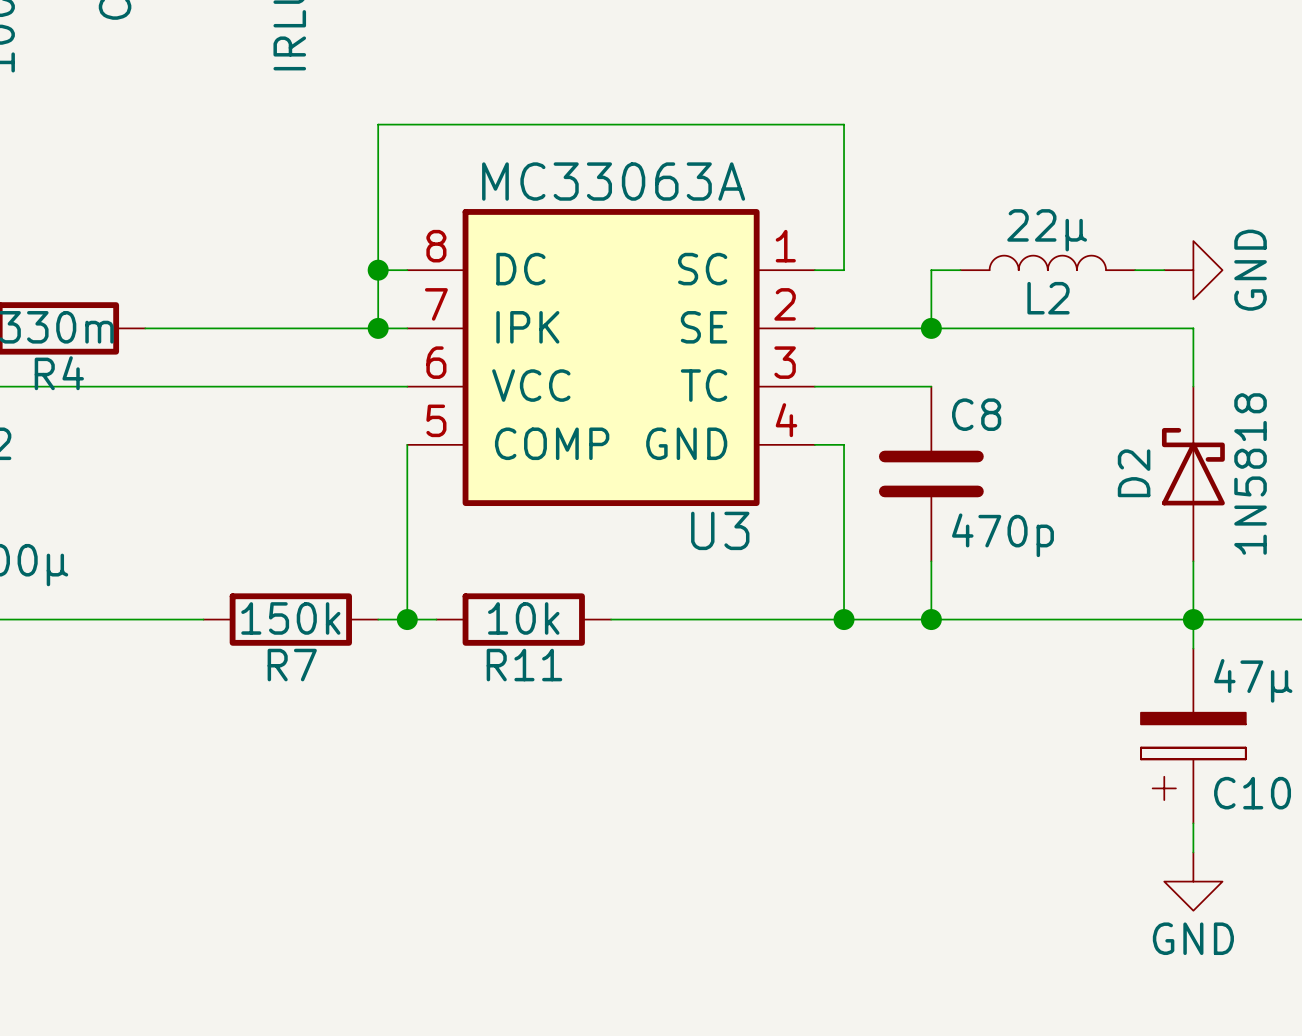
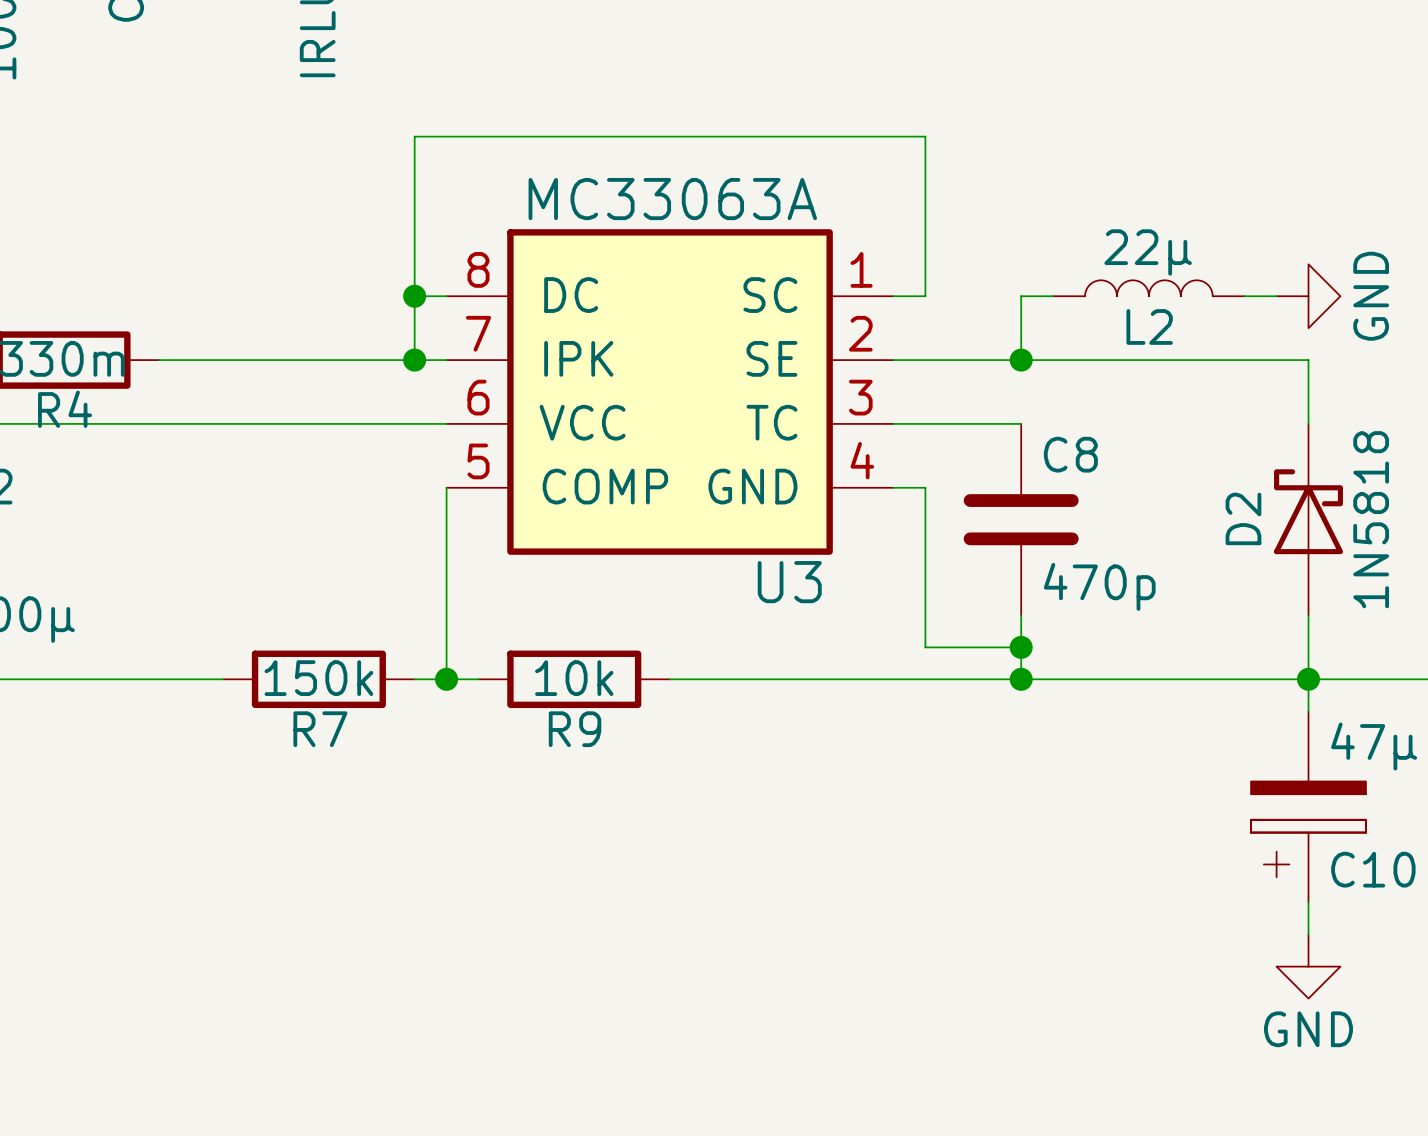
wire: (844, 590) (844, 619) -> (925, 647) (1021, 647)
junction position: (844, 619) -> (1021, 647)
R11 name: R11 (524, 665) -> R9 (575, 729)

